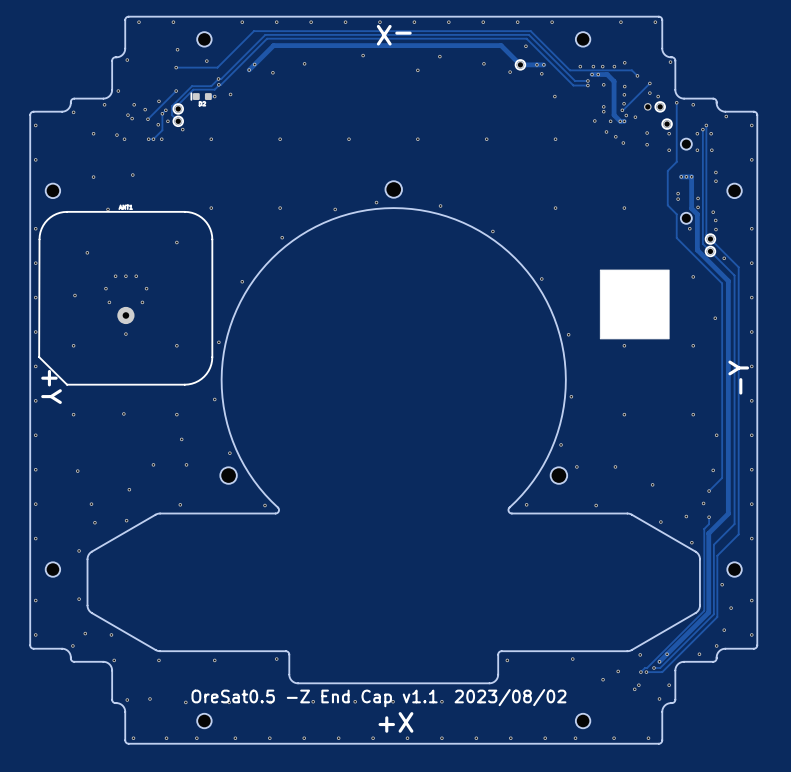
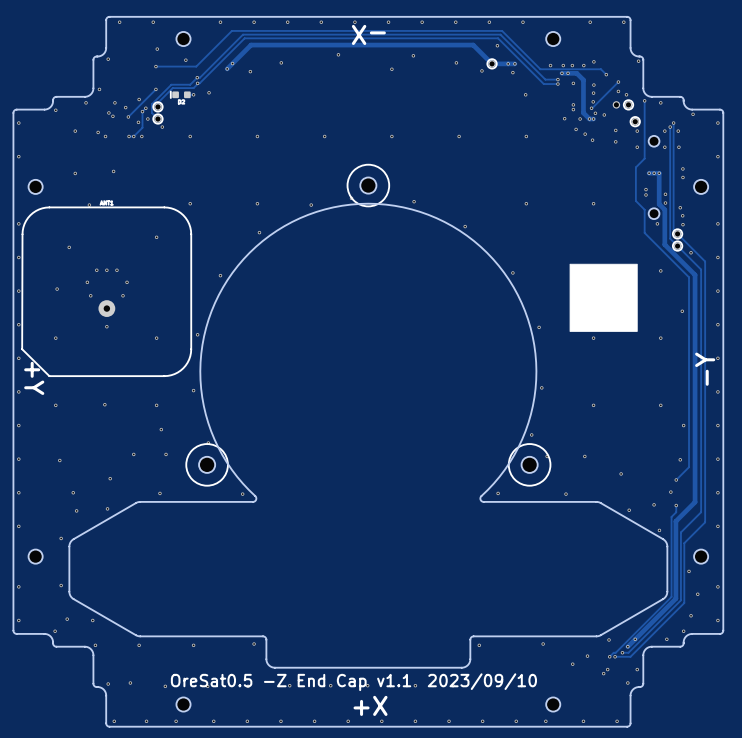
part footprint: [385, 181, 403, 198] -> [347, 164, 390, 207]
part footprint: [220, 467, 237, 484] -> [185, 443, 229, 487]
part footprint: [550, 467, 568, 484] -> [508, 443, 551, 487]
text: 2023/08/02 (510, 697) -> 2023/09/10 (482, 681)

